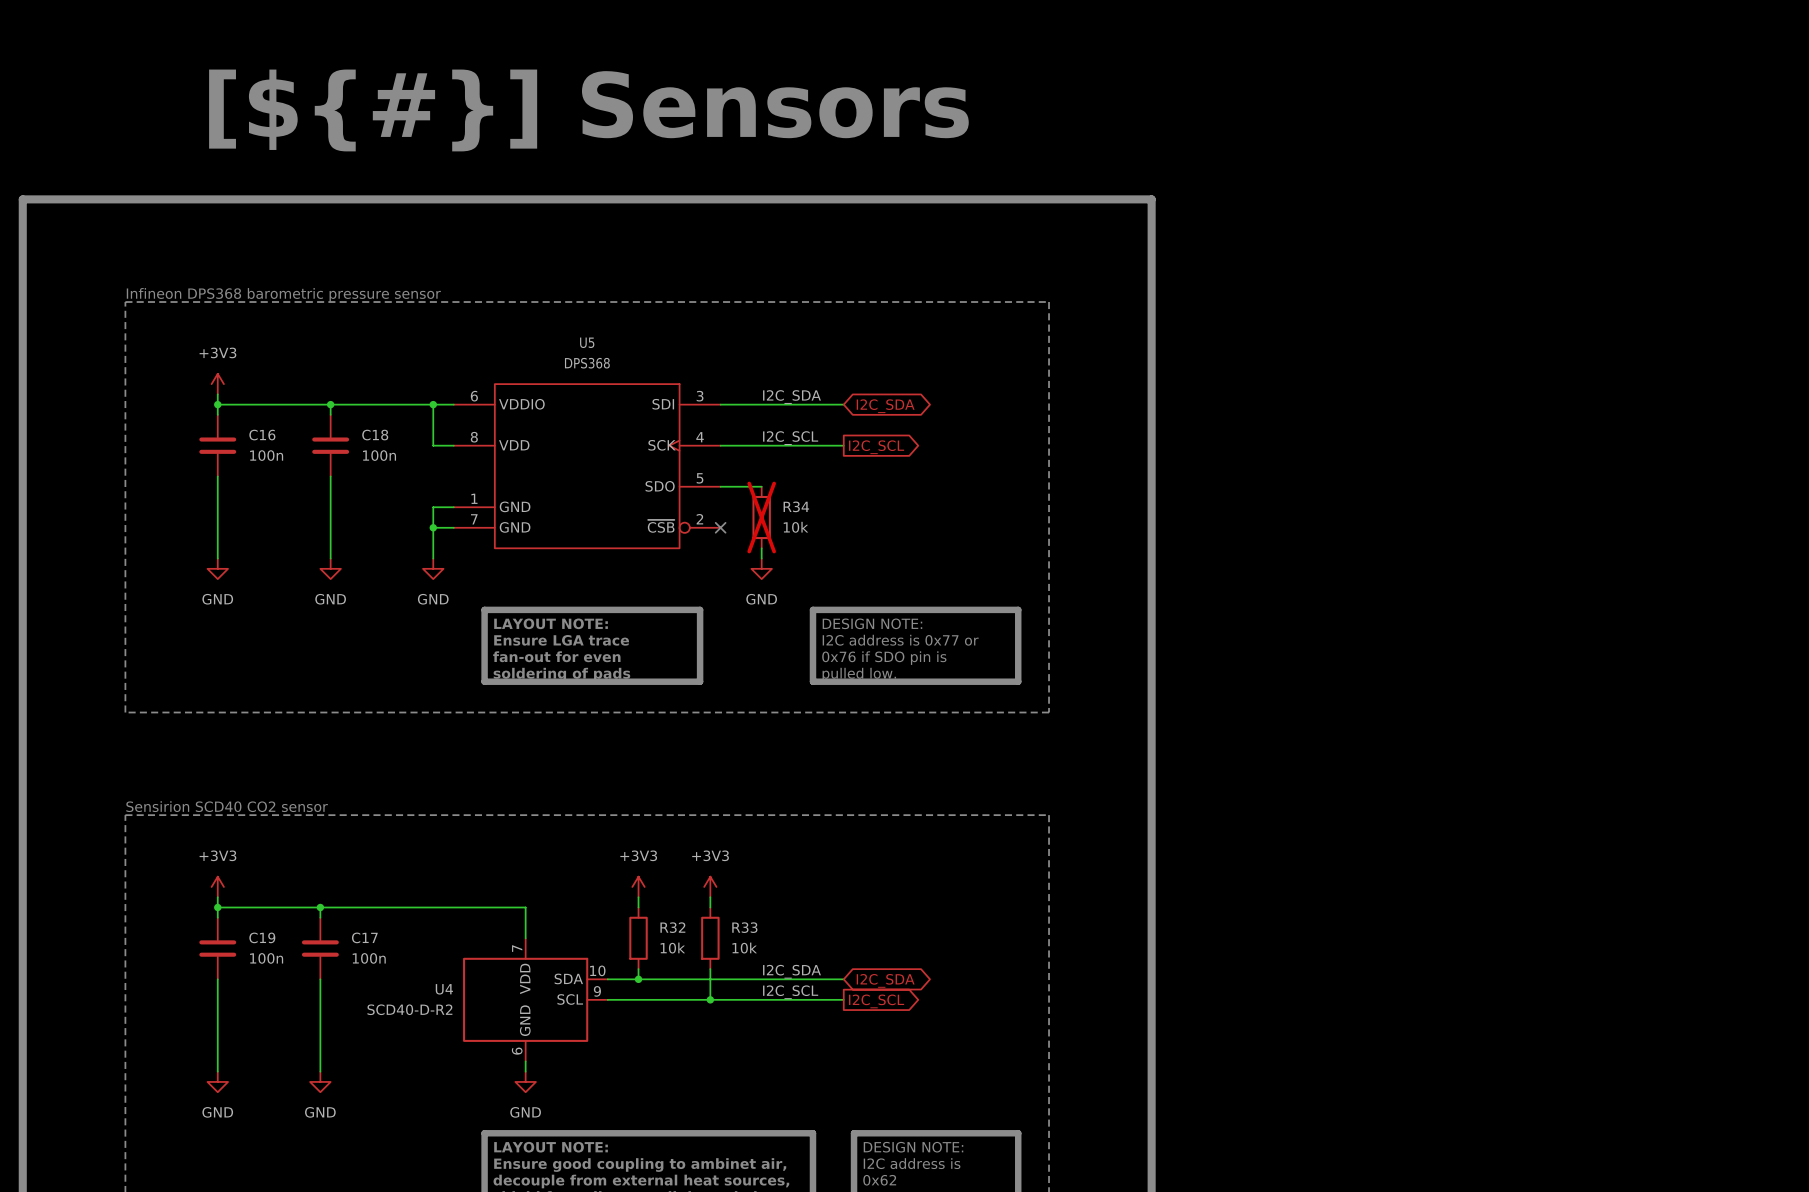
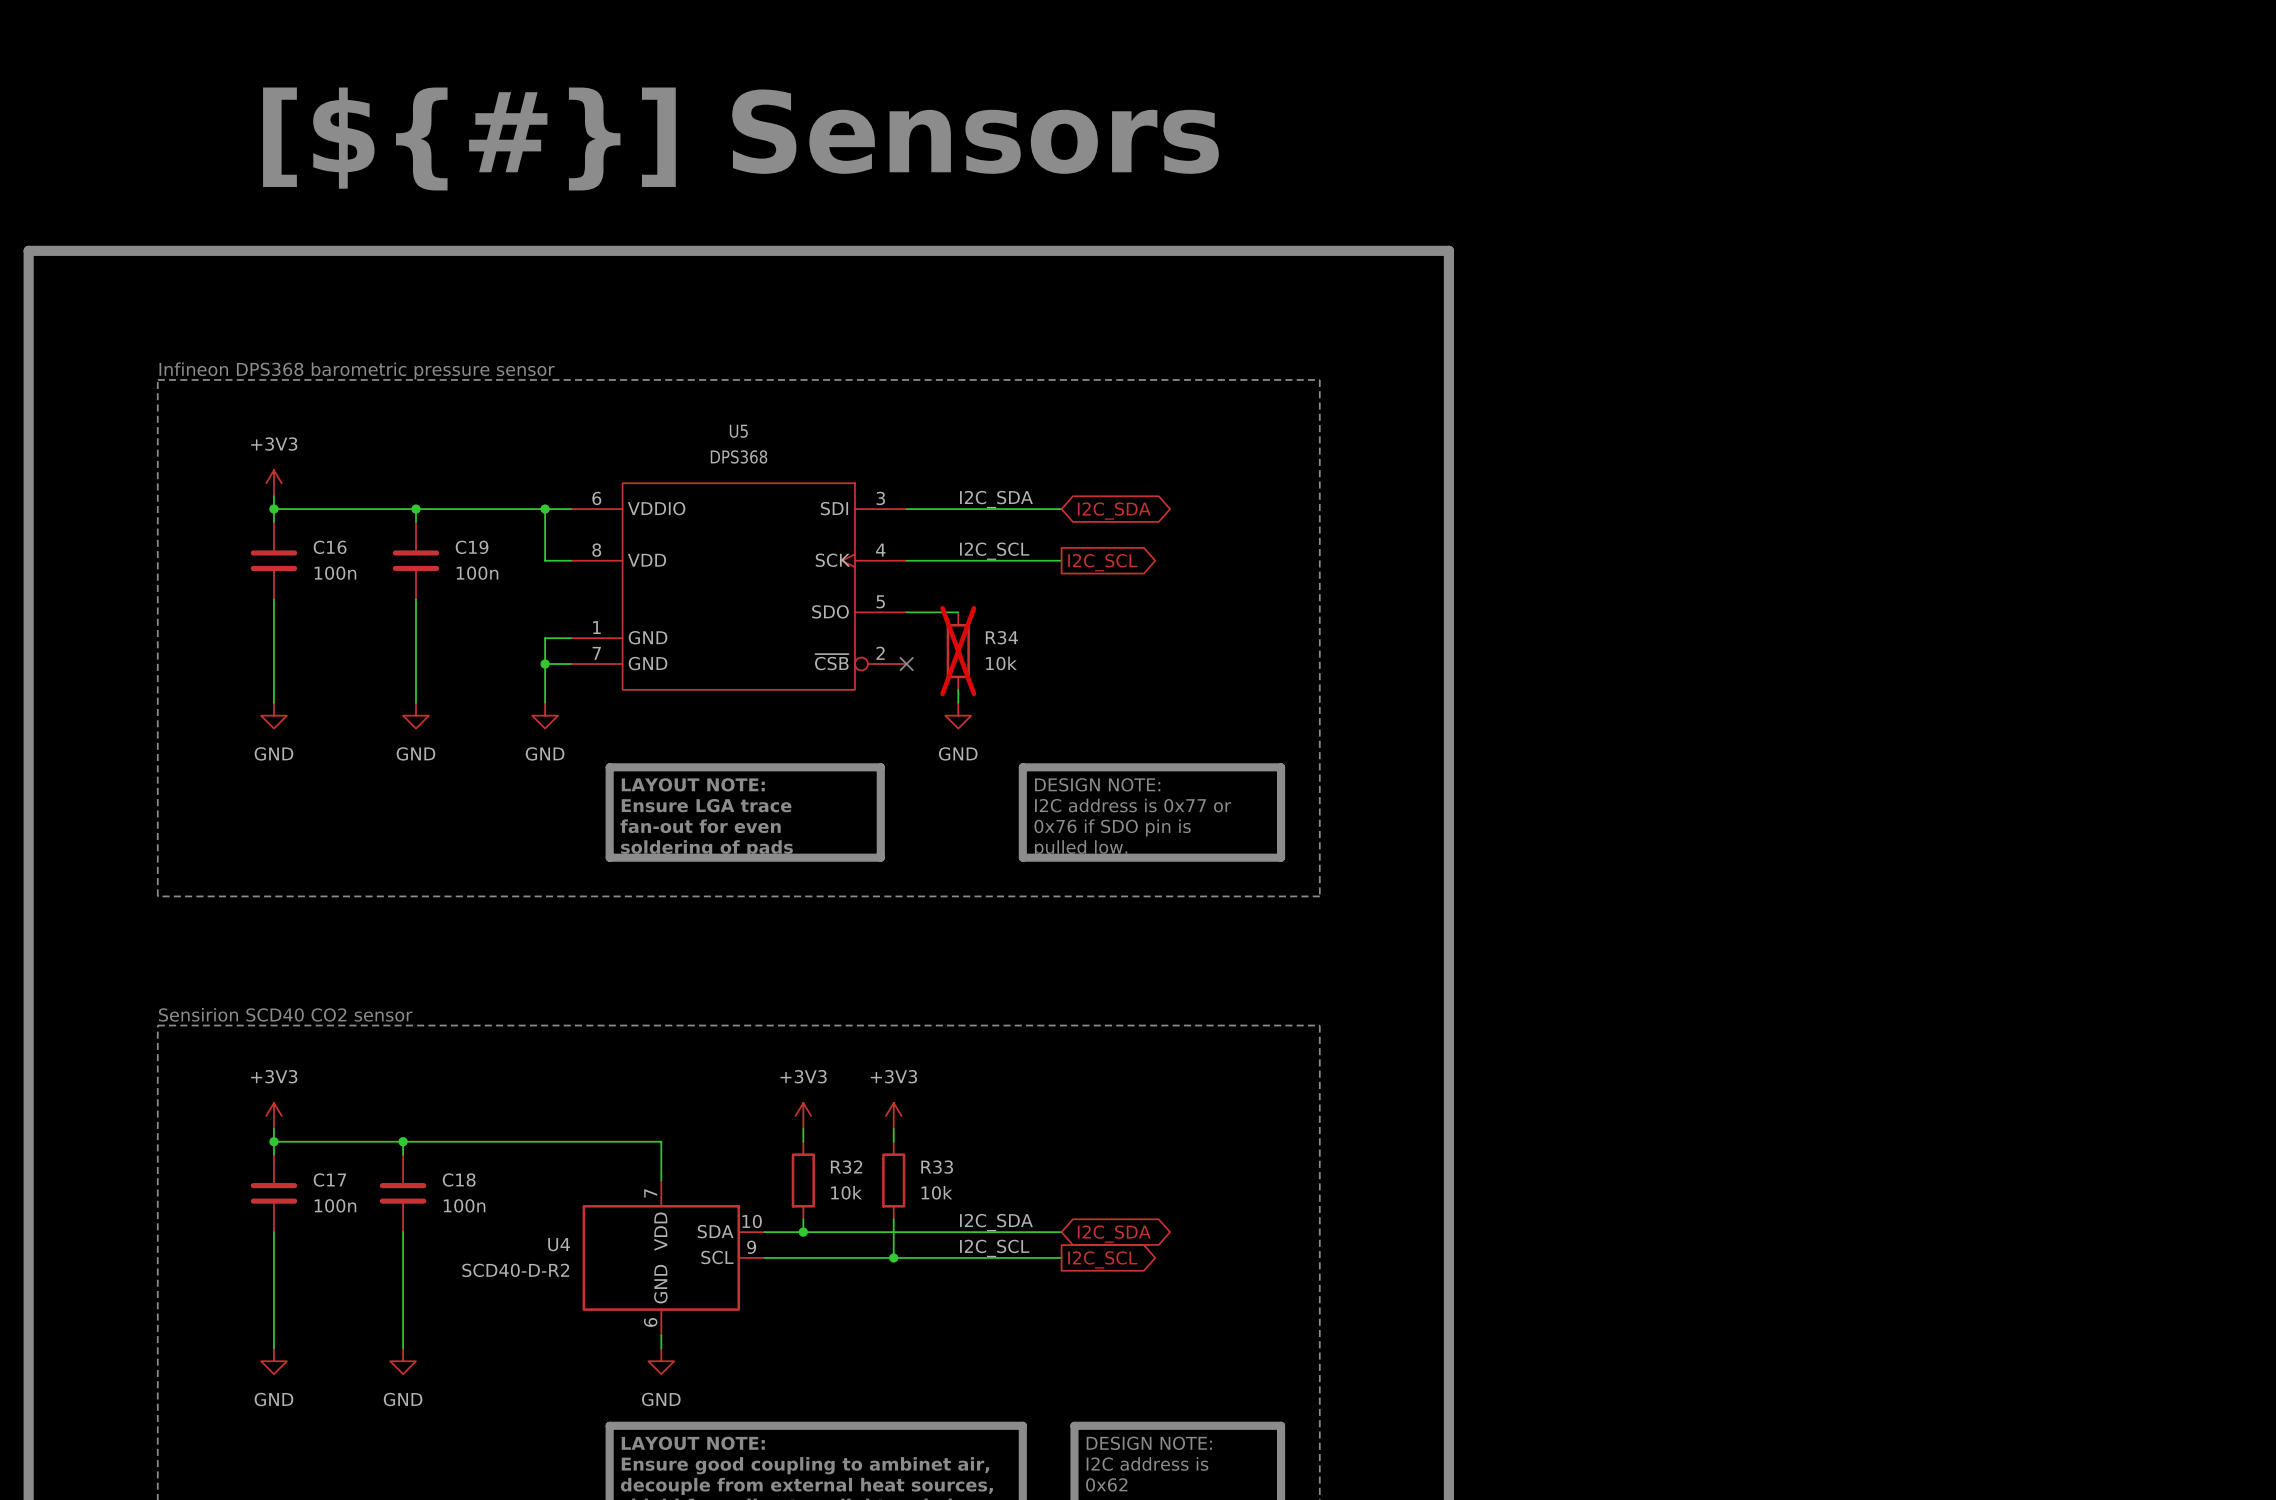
C18 name: C18 (375, 435) -> C19 (472, 547)
C19 name: C19 (262, 937) -> C17 (329, 1180)
C17 name: C17 (364, 937) -> C18 (459, 1180)

